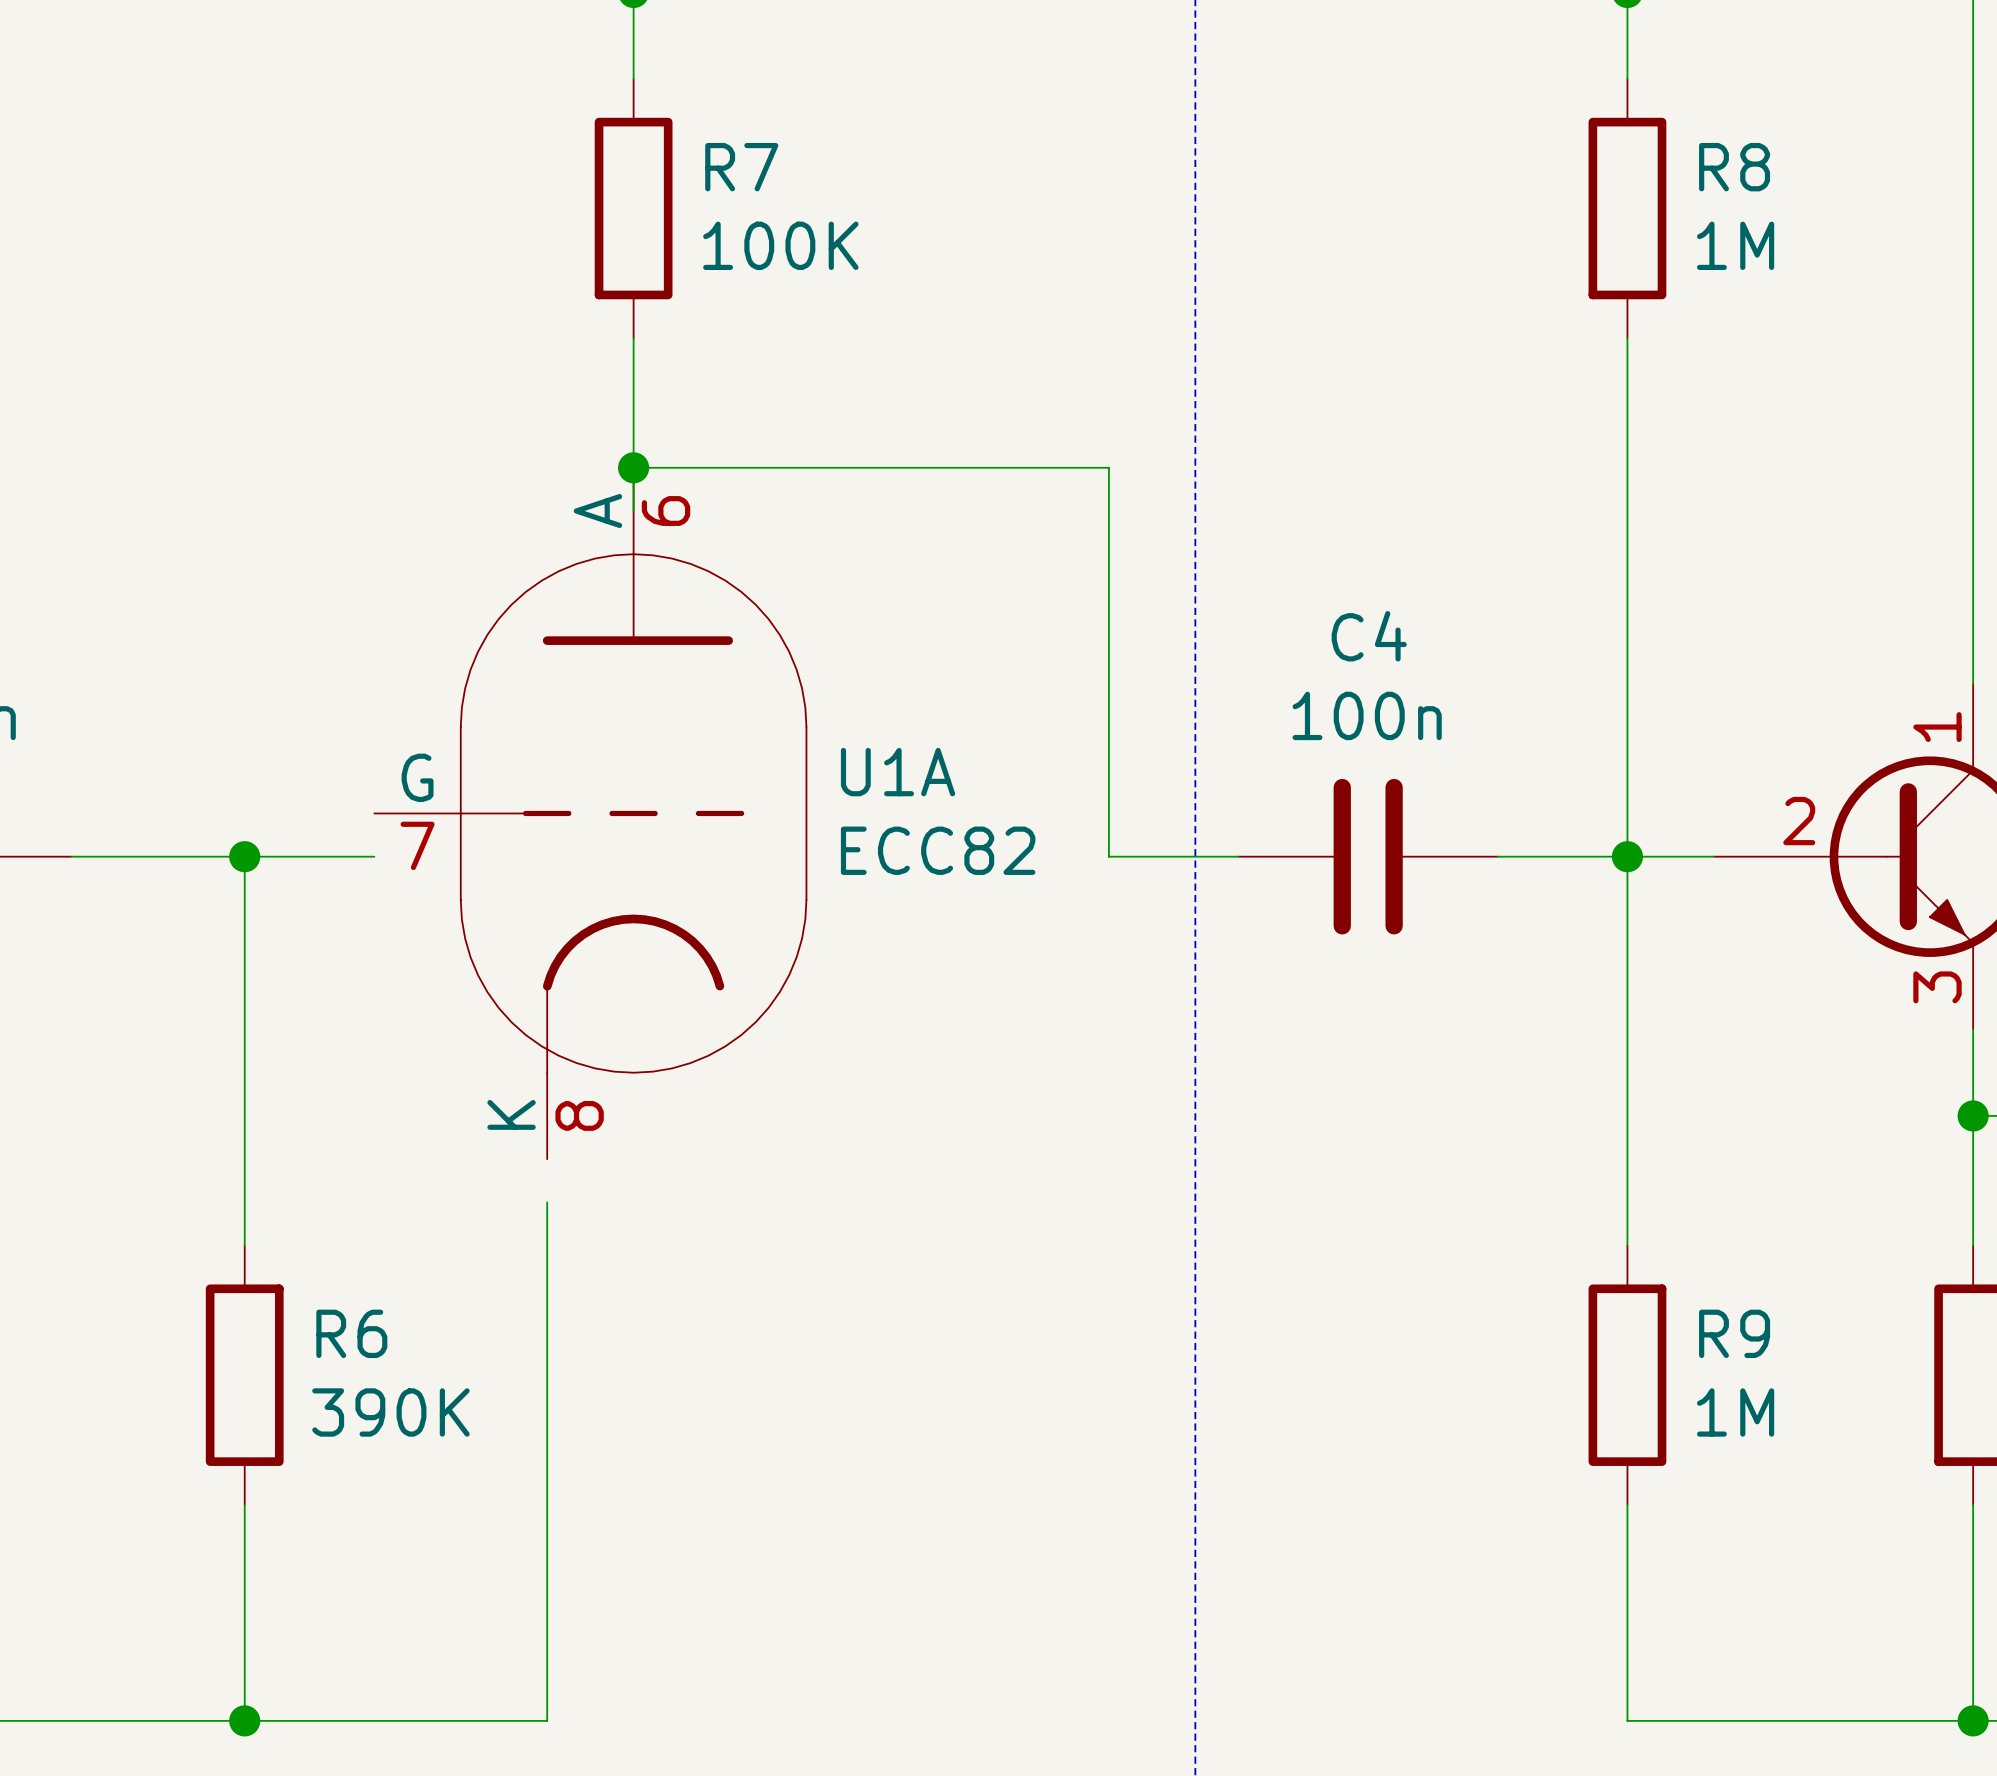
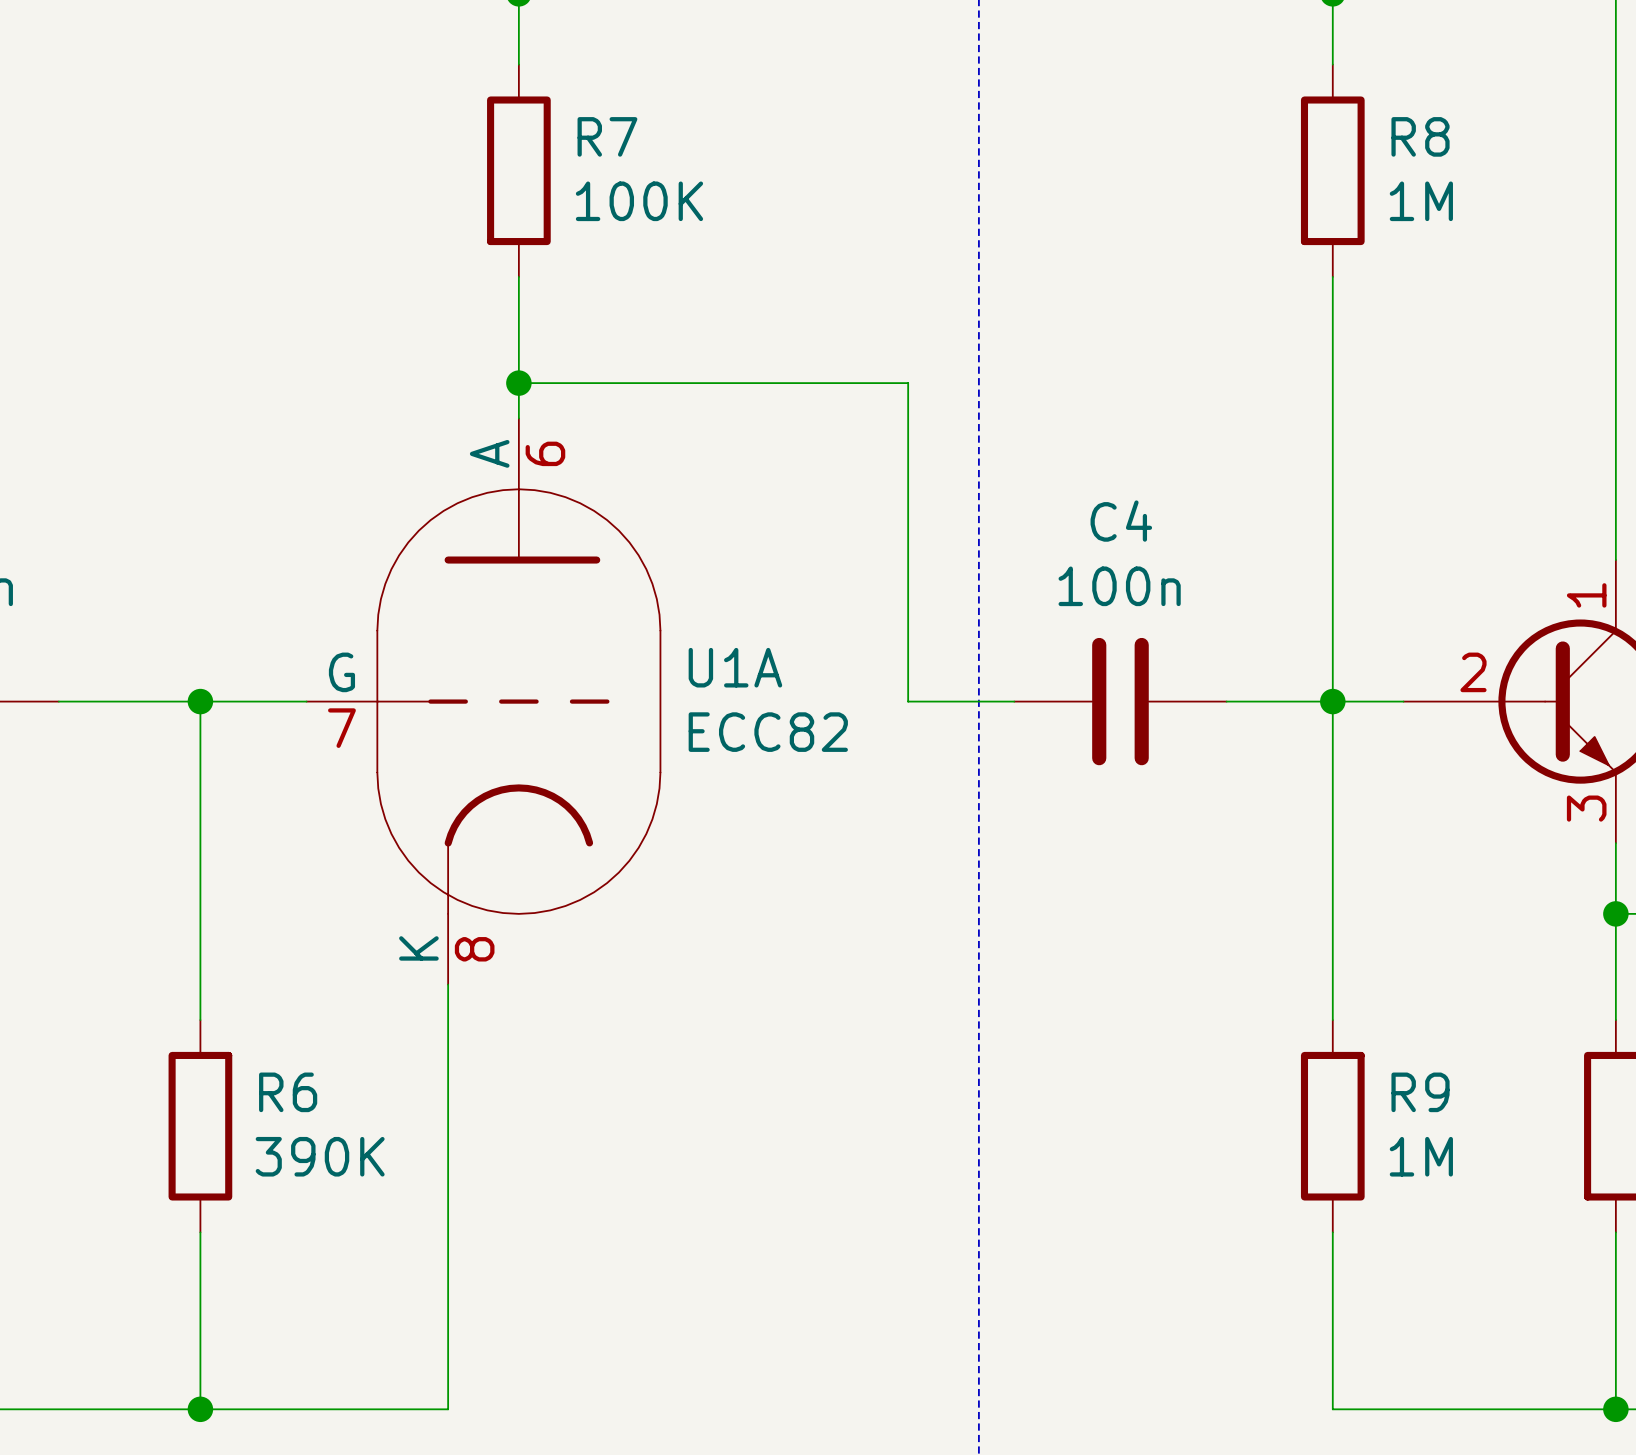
U1A position: (590, 813) -> (483, 701)

